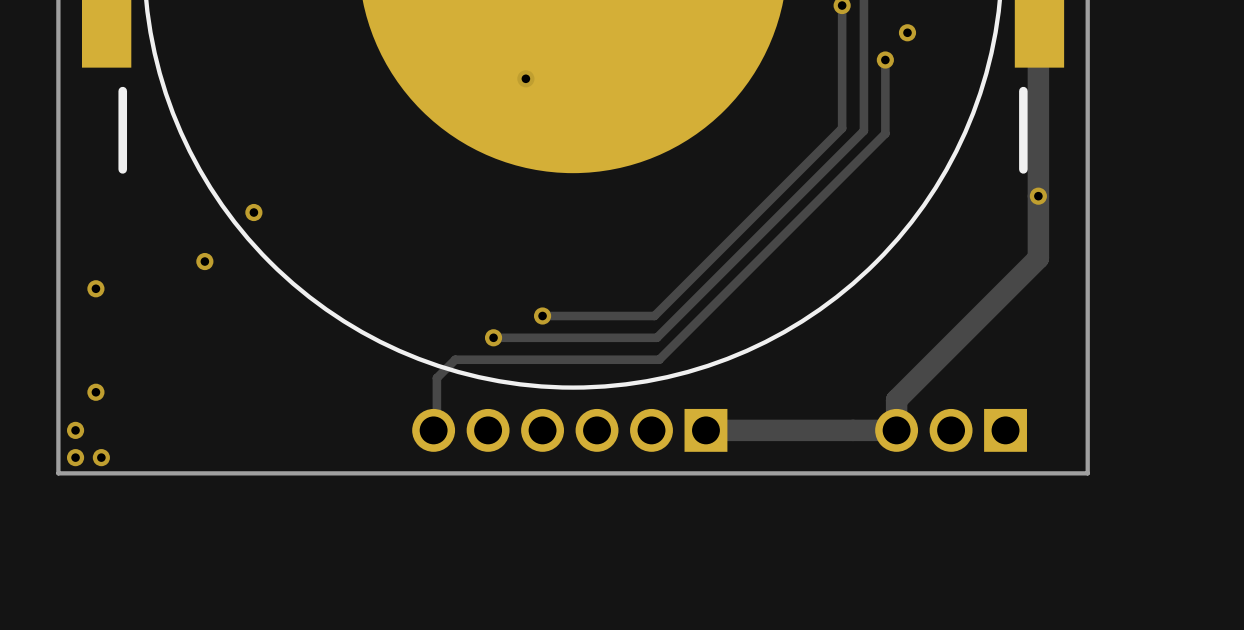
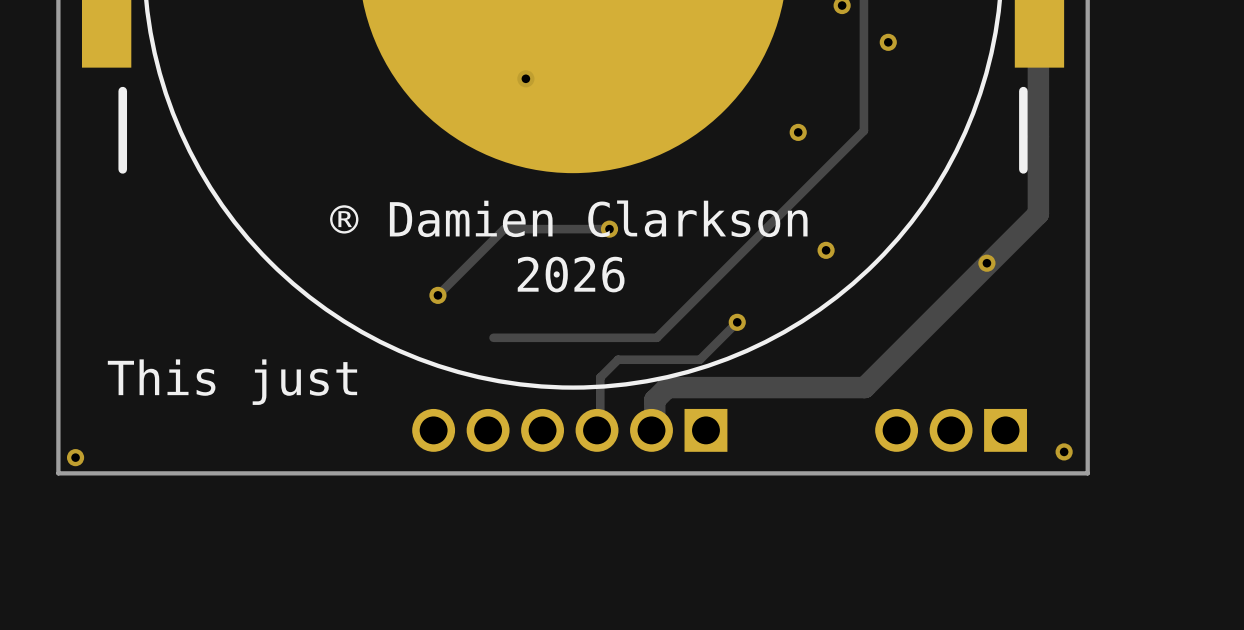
track: (842, 5) (842, 128) (654, 316) (542, 316) -> none
via: (907, 32) -> none
via: none -> (888, 42)
track: (885, 60) (885, 133) (659, 359) -> (737, 322) (699, 359) (659, 359)
via: (885, 60) -> none
via: none -> (798, 132)
via position: (1038, 196) -> (986, 263)
via: (253, 212) -> none
track: (1038, 213) (1038, 258) (896, 400) (896, 430) (709, 430) -> (1038, 213) (864, 387) (667, 387) (654, 400) (654, 430)
text: none -> ® Damien Clarkson (568, 218)
track: none -> (609, 229) (504, 229) (437, 295)
via: none -> (609, 229)
via: none -> (826, 250)
via: (204, 261) -> none
text: none -> 2026 (571, 274)
via: (95, 288) -> none
via: none -> (437, 295)
via: (542, 316) -> none
via: none -> (737, 322)
via: (493, 337) -> none
track: (618, 359) (455, 359) (436, 378) (436, 430) -> (618, 359) (600, 377) (600, 430)
text: none -> This just (232, 382)
via: (95, 392) -> none
via: (75, 430) -> none
via: none -> (1064, 451)
via: (101, 457) -> none

